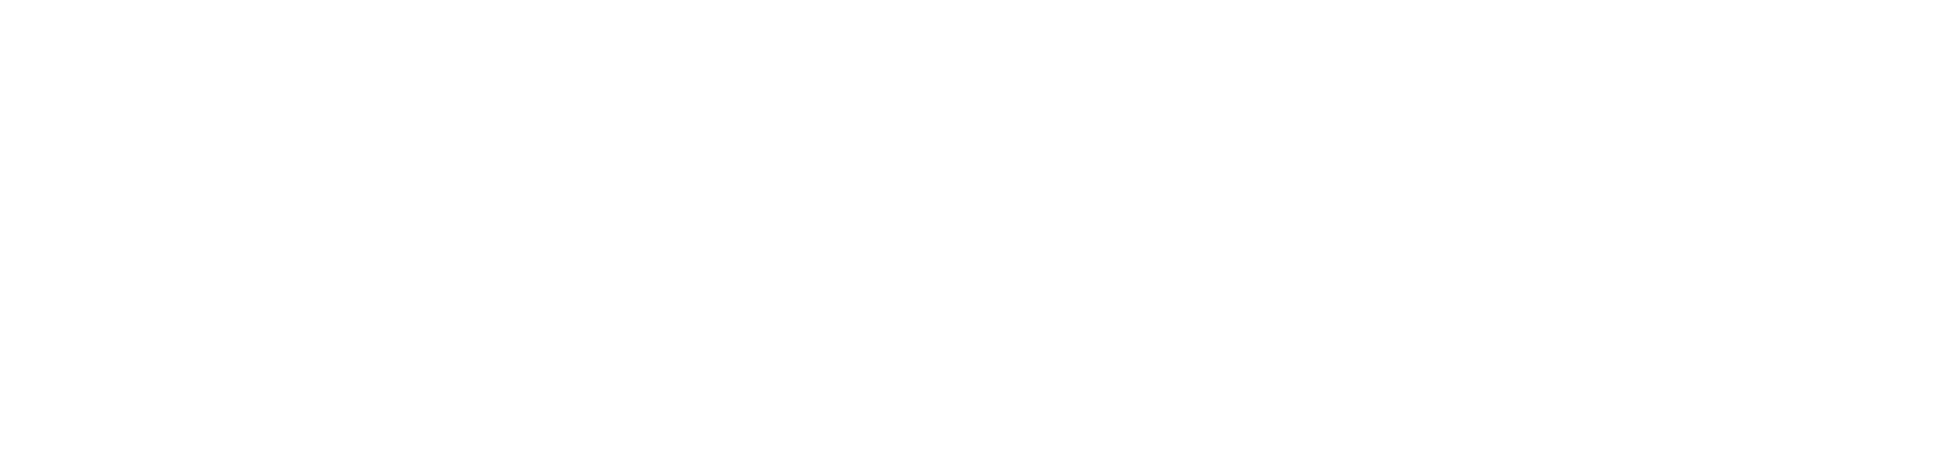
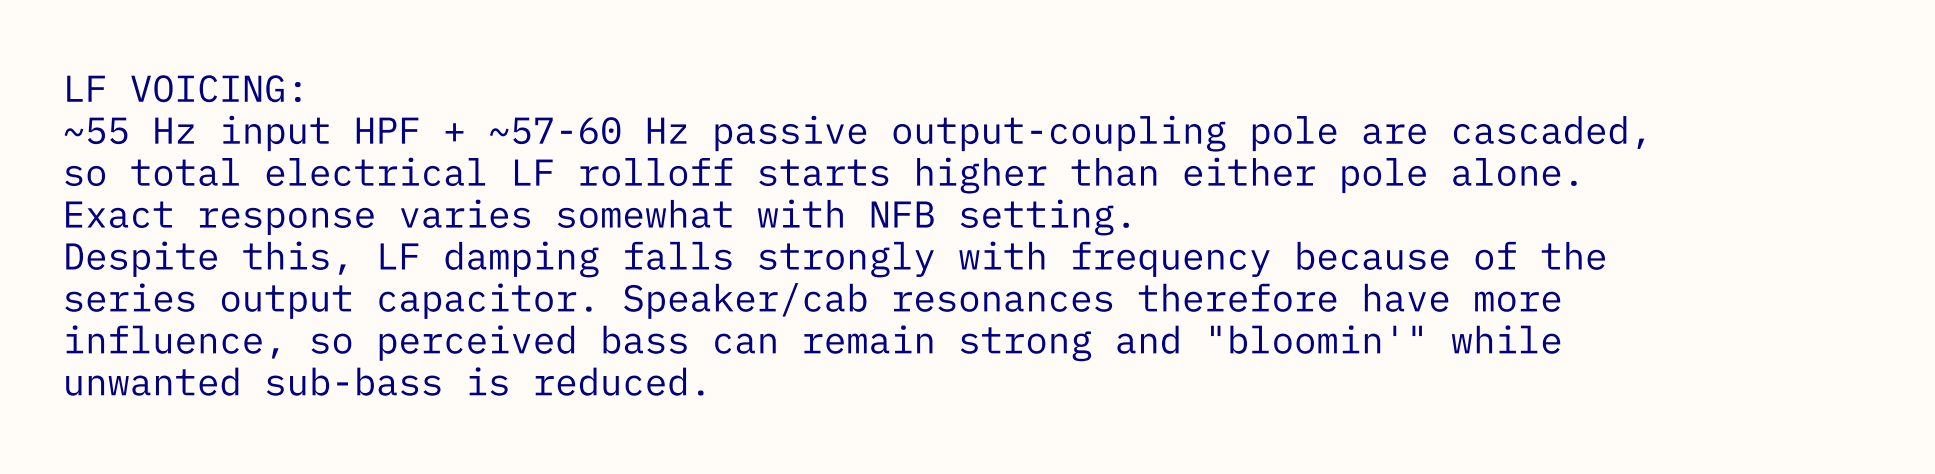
text: none -> LF VOICING: (183, 88)
text: none -> ~55 Hz input HPF + ~57-60 Hz passive output-coupling pole are cascaded, (854, 133)
text: none -> so total electrical LF rolloff starts higher than either pole alone. (820, 175)
text: none -> Exact response varies somewhat with NFB setting. (597, 217)
text: none -> Despite this, LF damping falls strongly with frequency because of the (835, 259)
text: none -> series output capacitor. Speaker/cab resonances therefore have more (812, 300)
text: none -> influence, so perceived bass can remain strong and "bloomin'" while (813, 343)
text: none -> unwanted sub-bass is reduced. (384, 381)

